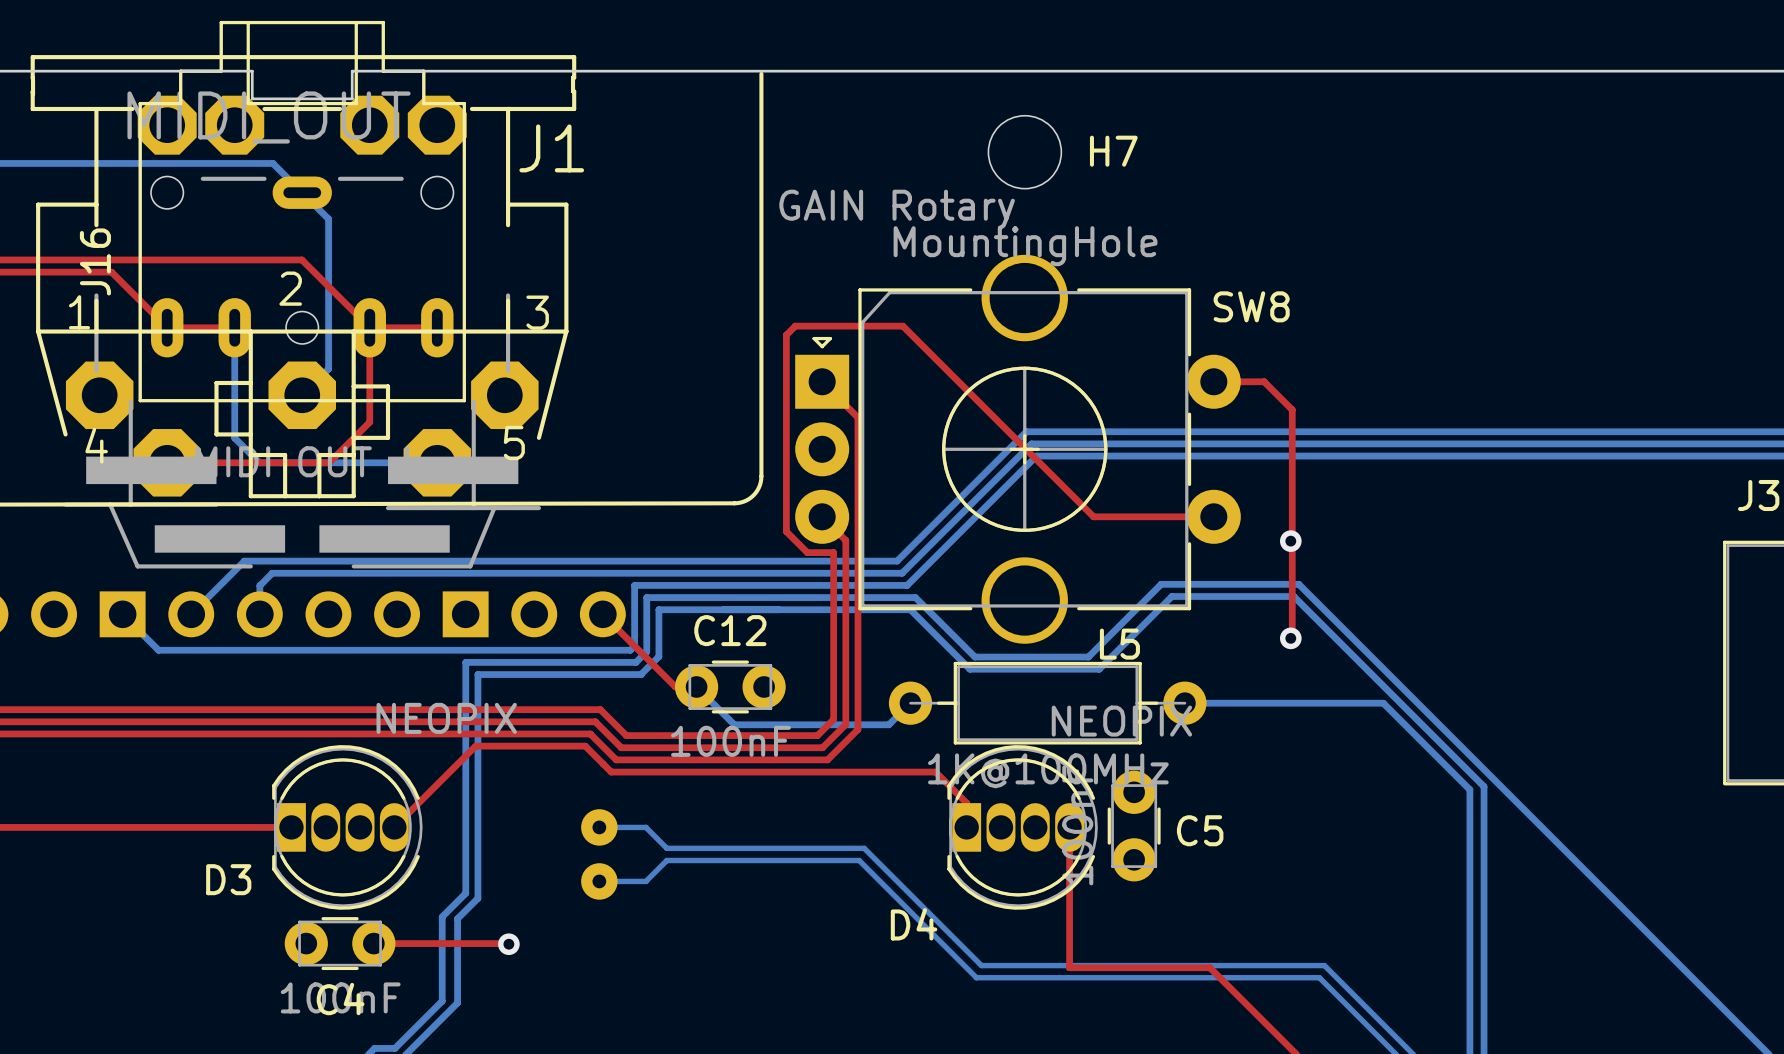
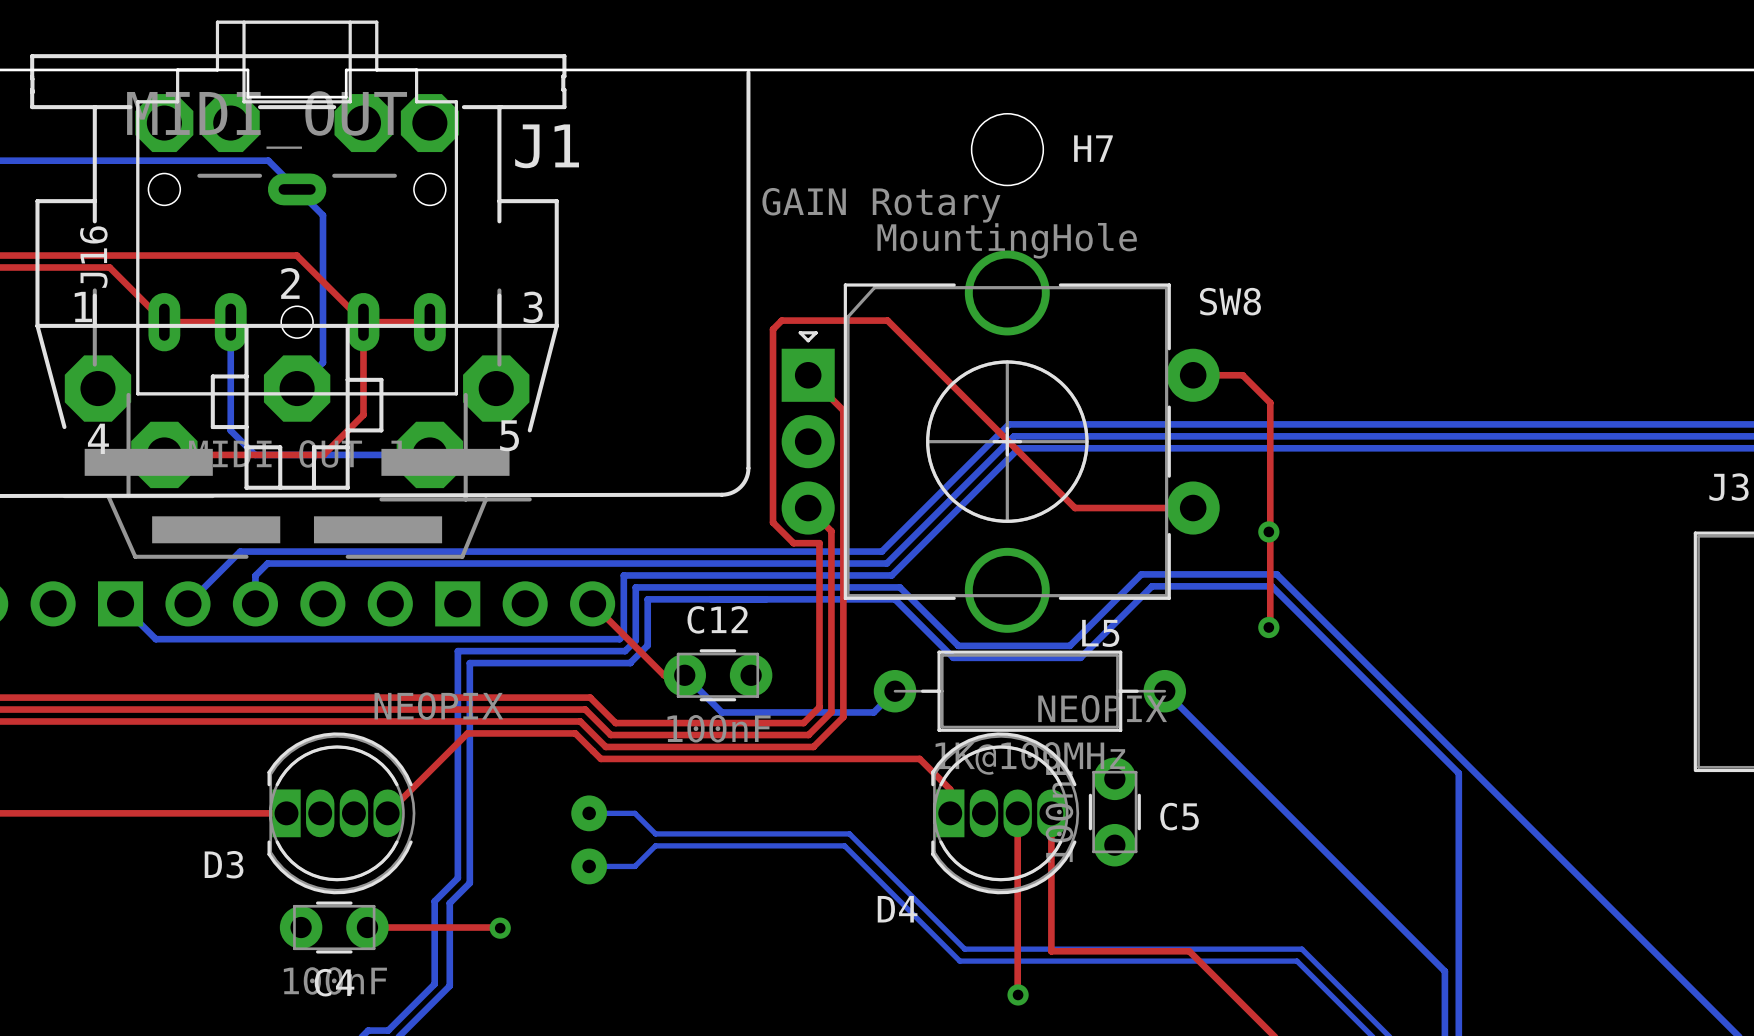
bottom track: (1184, 703) (1383, 703) (1469, 789) (1469, 988) -> (1164, 691) (1444, 971)
top track: none -> (1017, 813) (1018, 994)
via: none -> (1018, 994)

